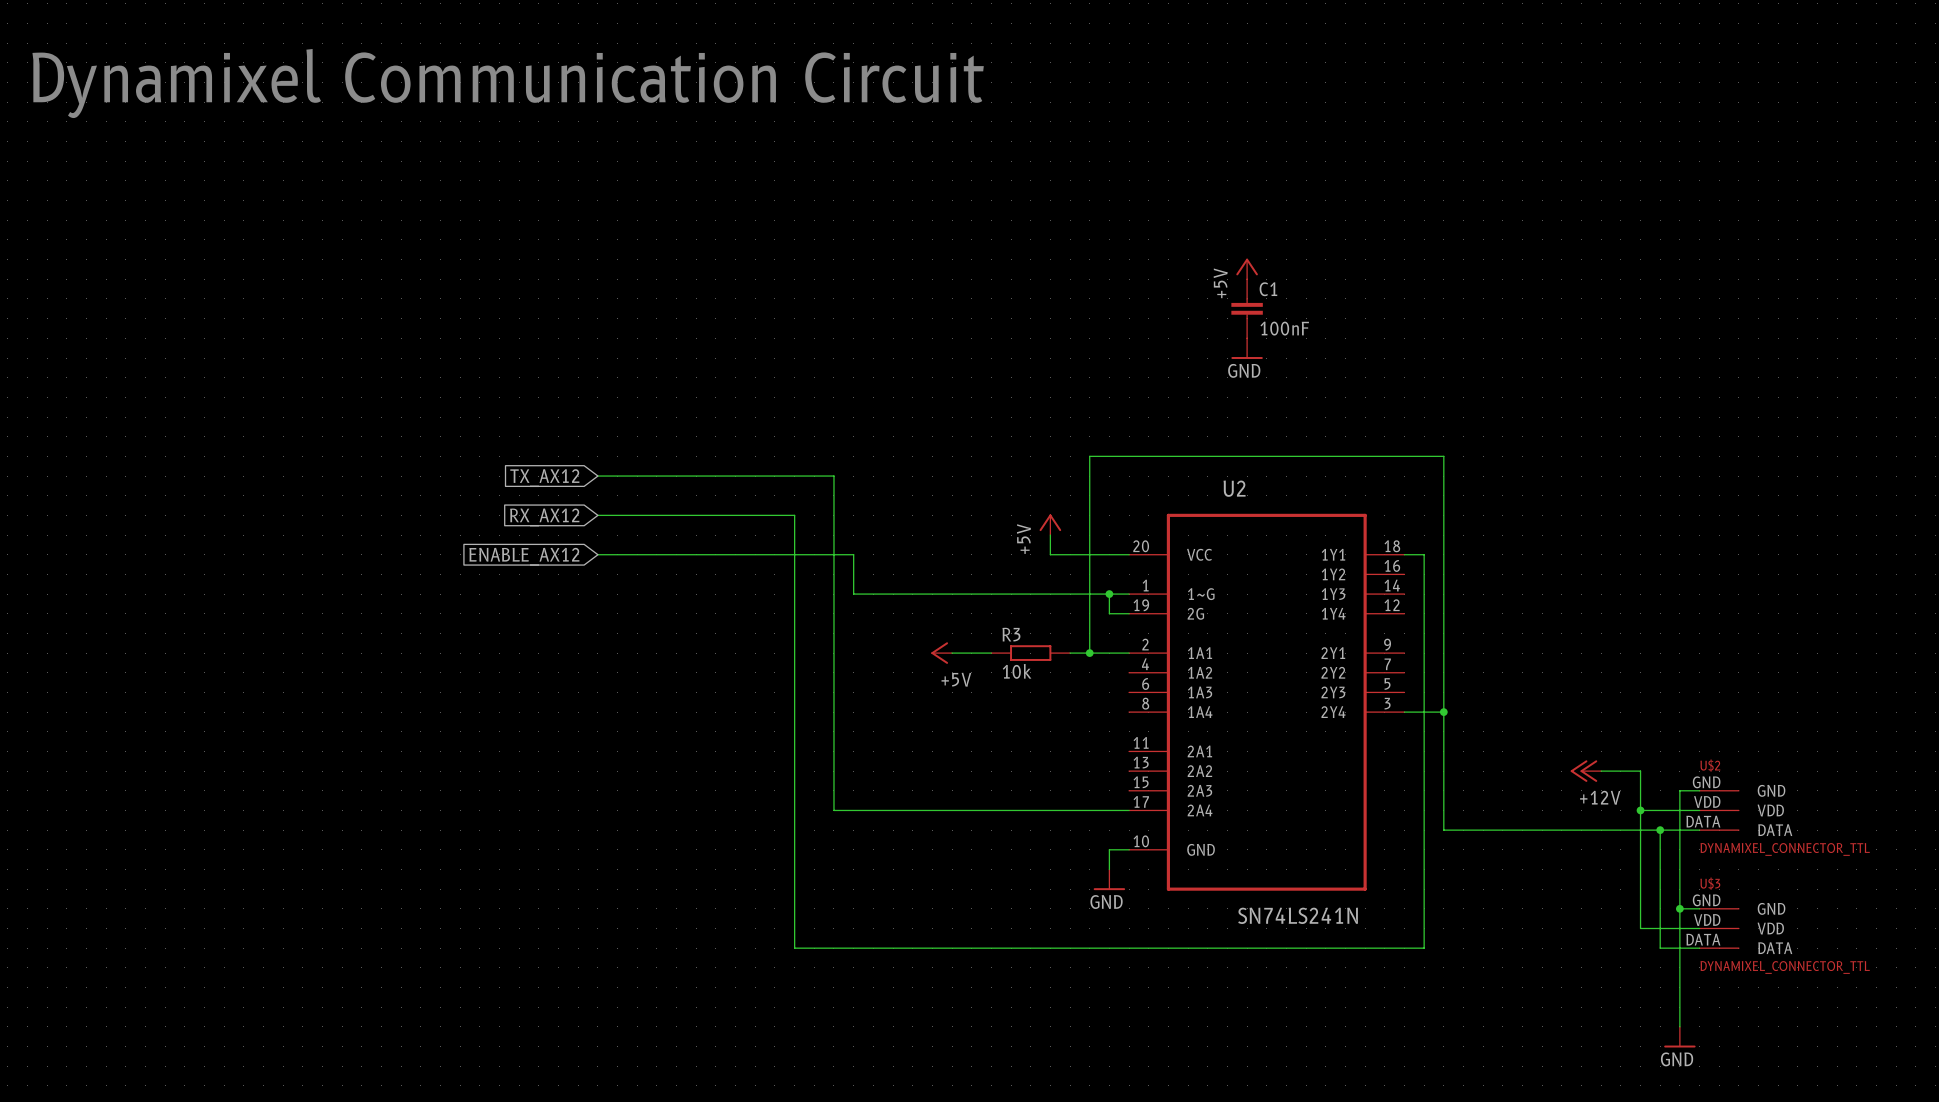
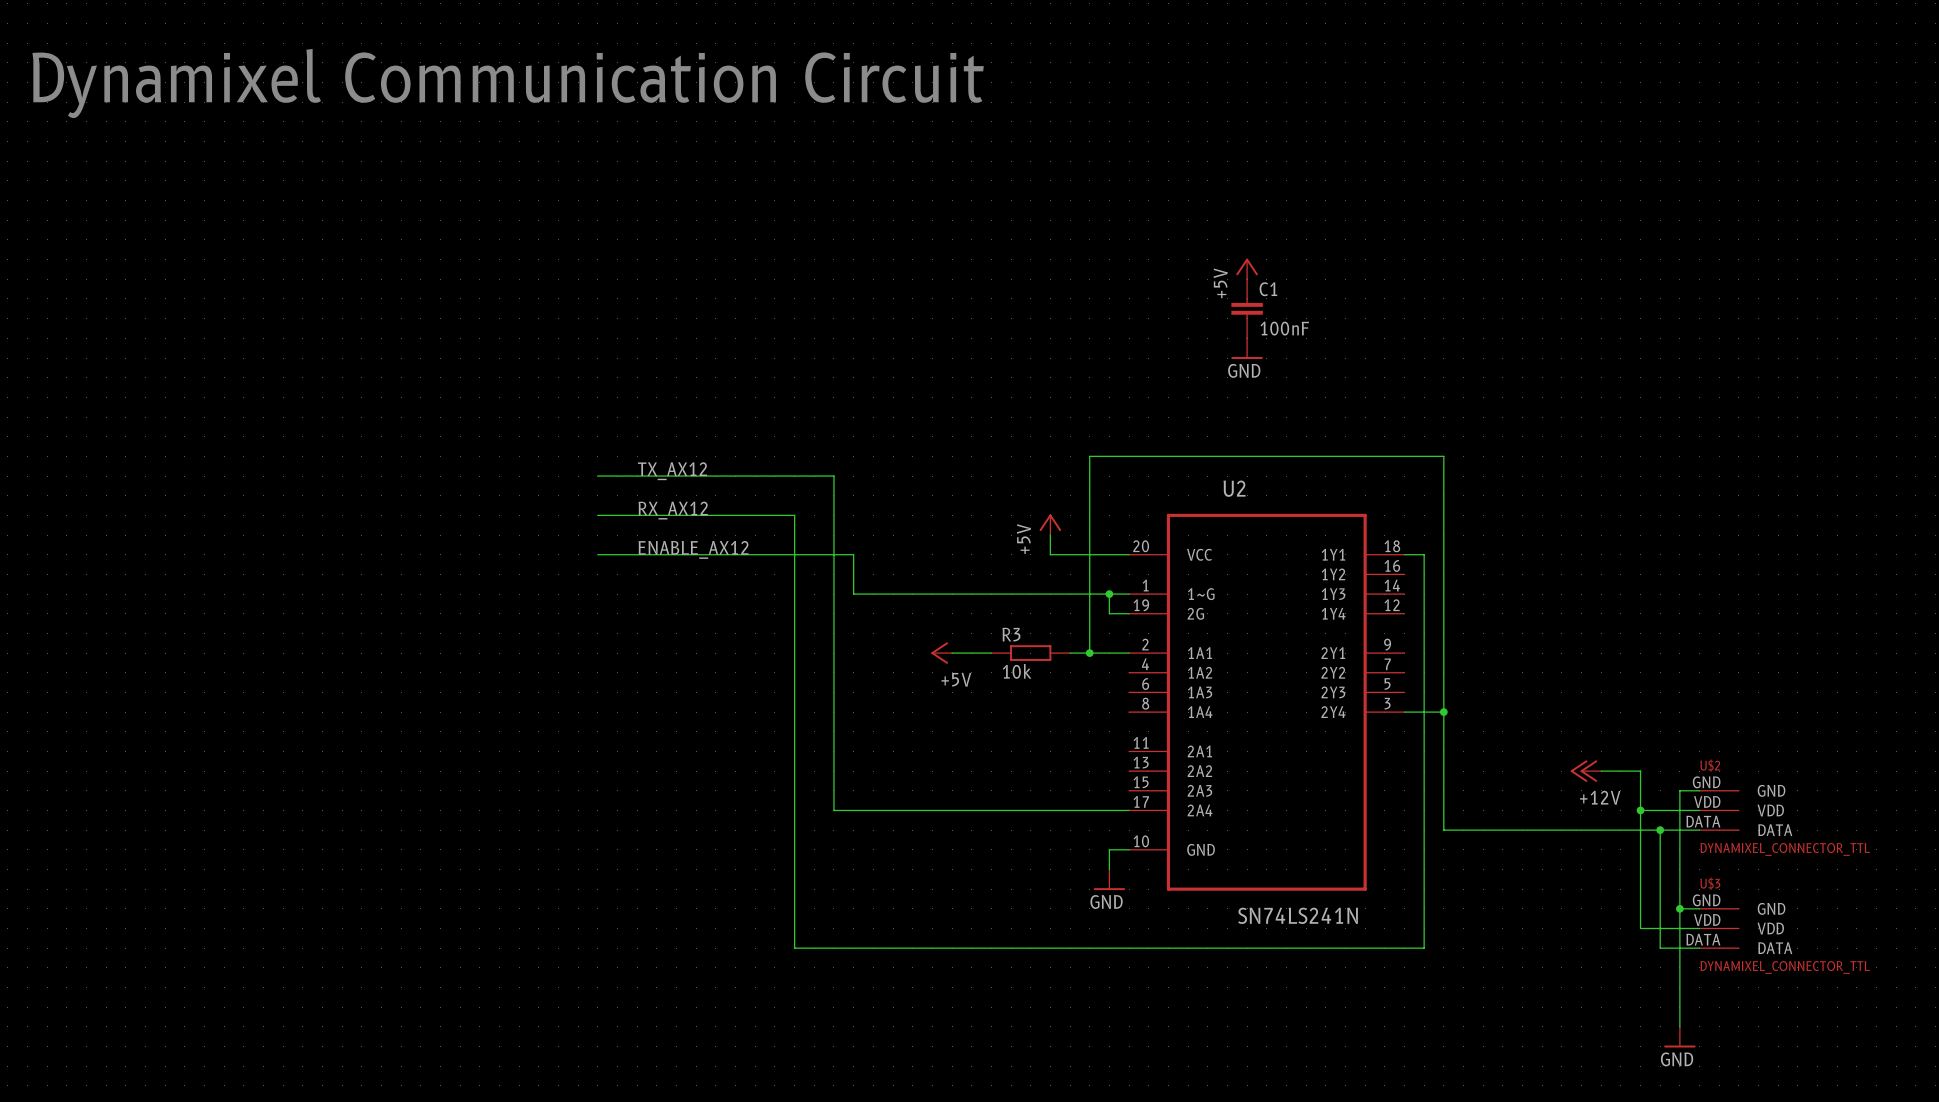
label: none -> TX_AX12 (672, 471)
global label: TX_AX12 (544, 478) -> none
label: none -> RX_AX12 (673, 510)
global label: RX_AX12 (544, 517) -> none
label: none -> ENABLE_AX12 (693, 549)
global label: ENABLE_AX12 (524, 556) -> none

